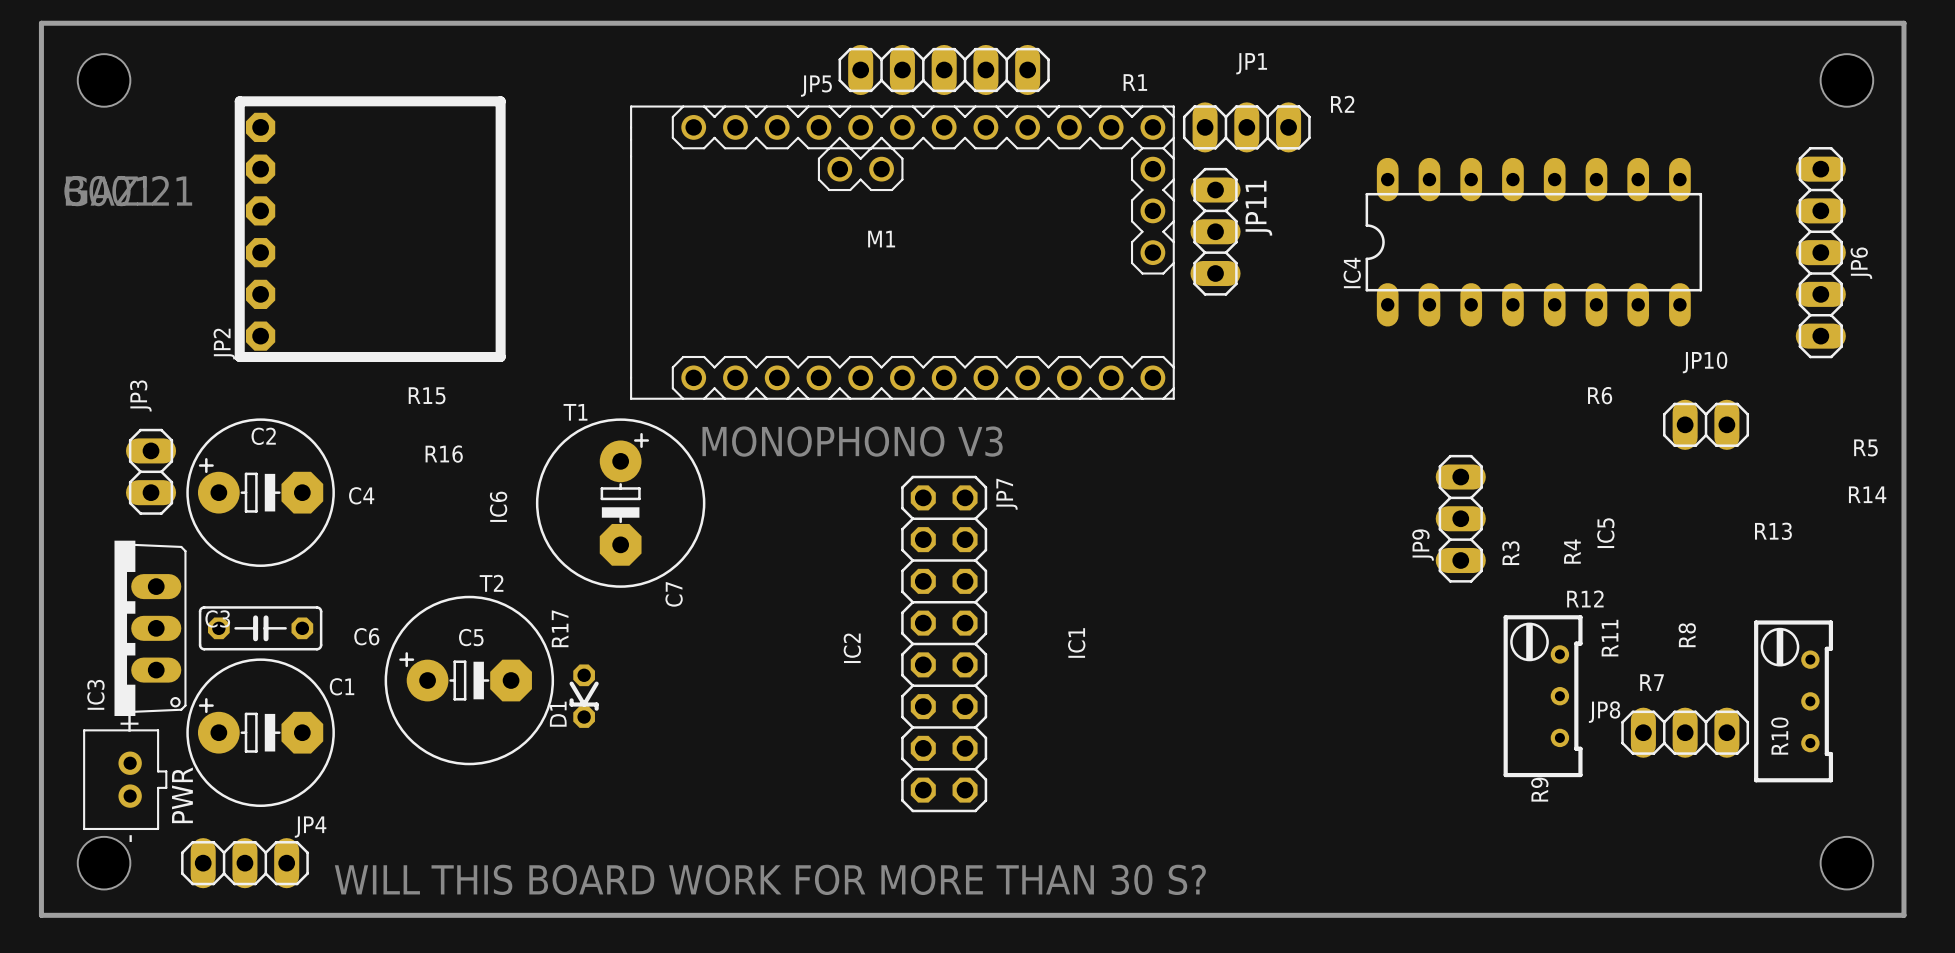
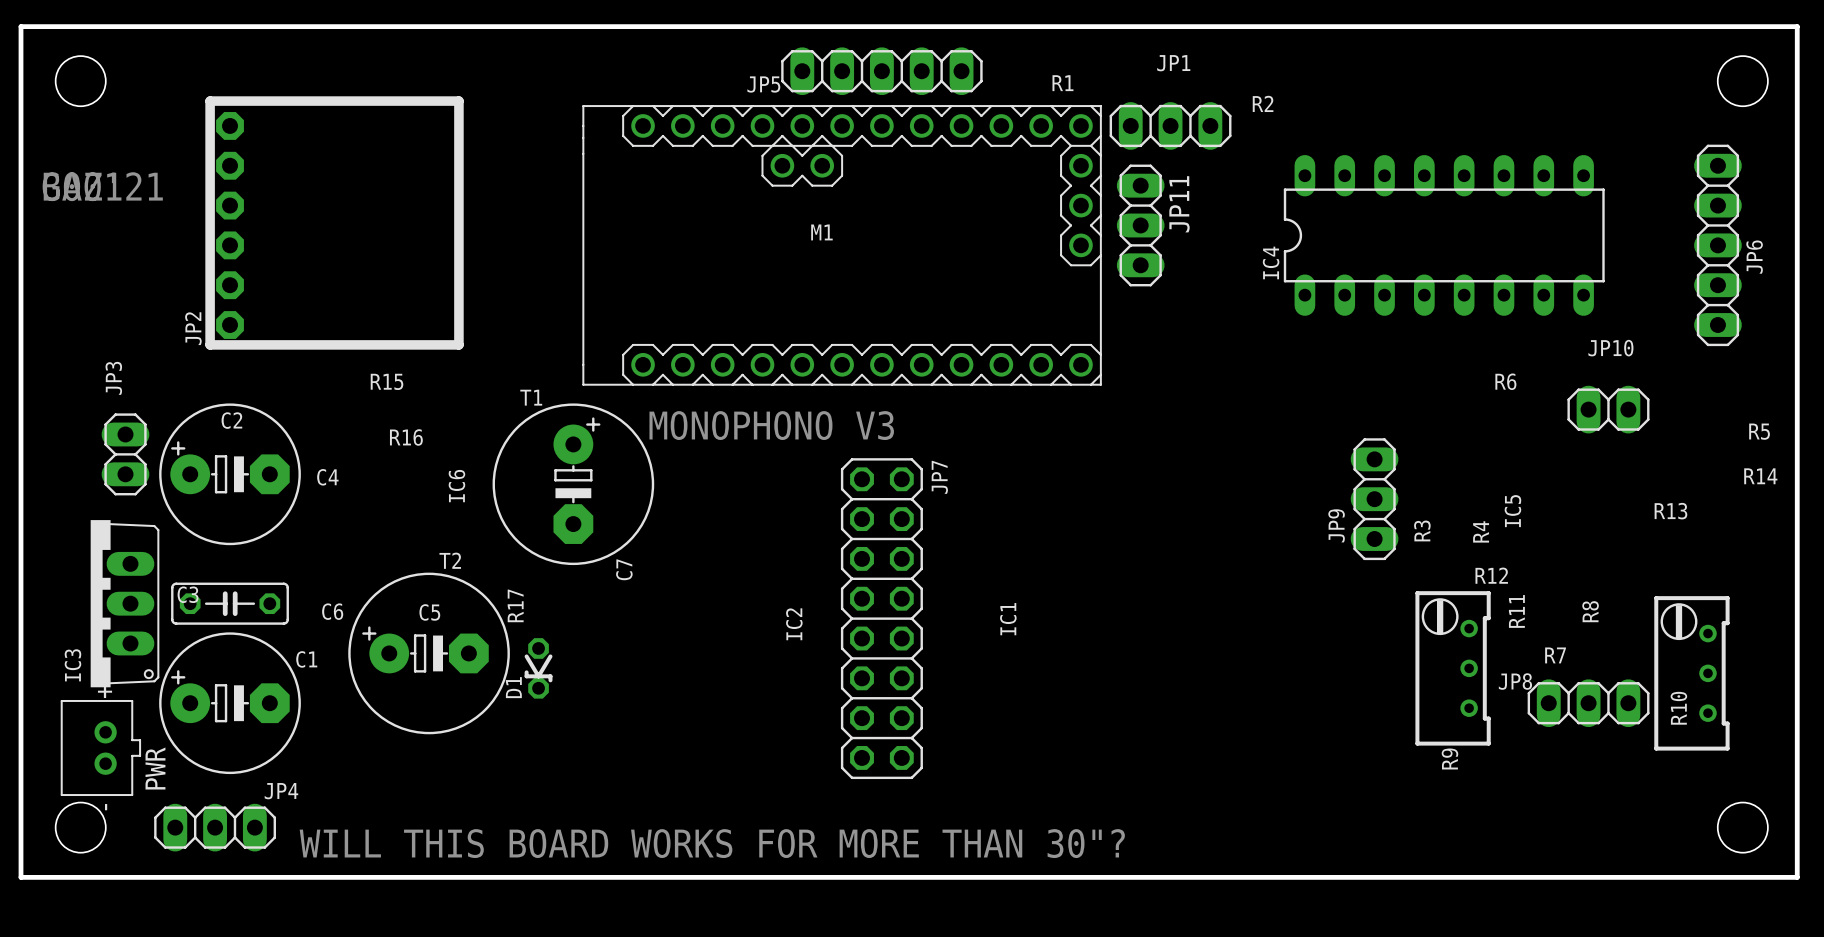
text: WILL THIS BOARD WORK FOR MORE THAN 30 S? (770, 879) -> WILL THIS BOARD WORKS FOR MORE THAN 30"? (712, 843)

